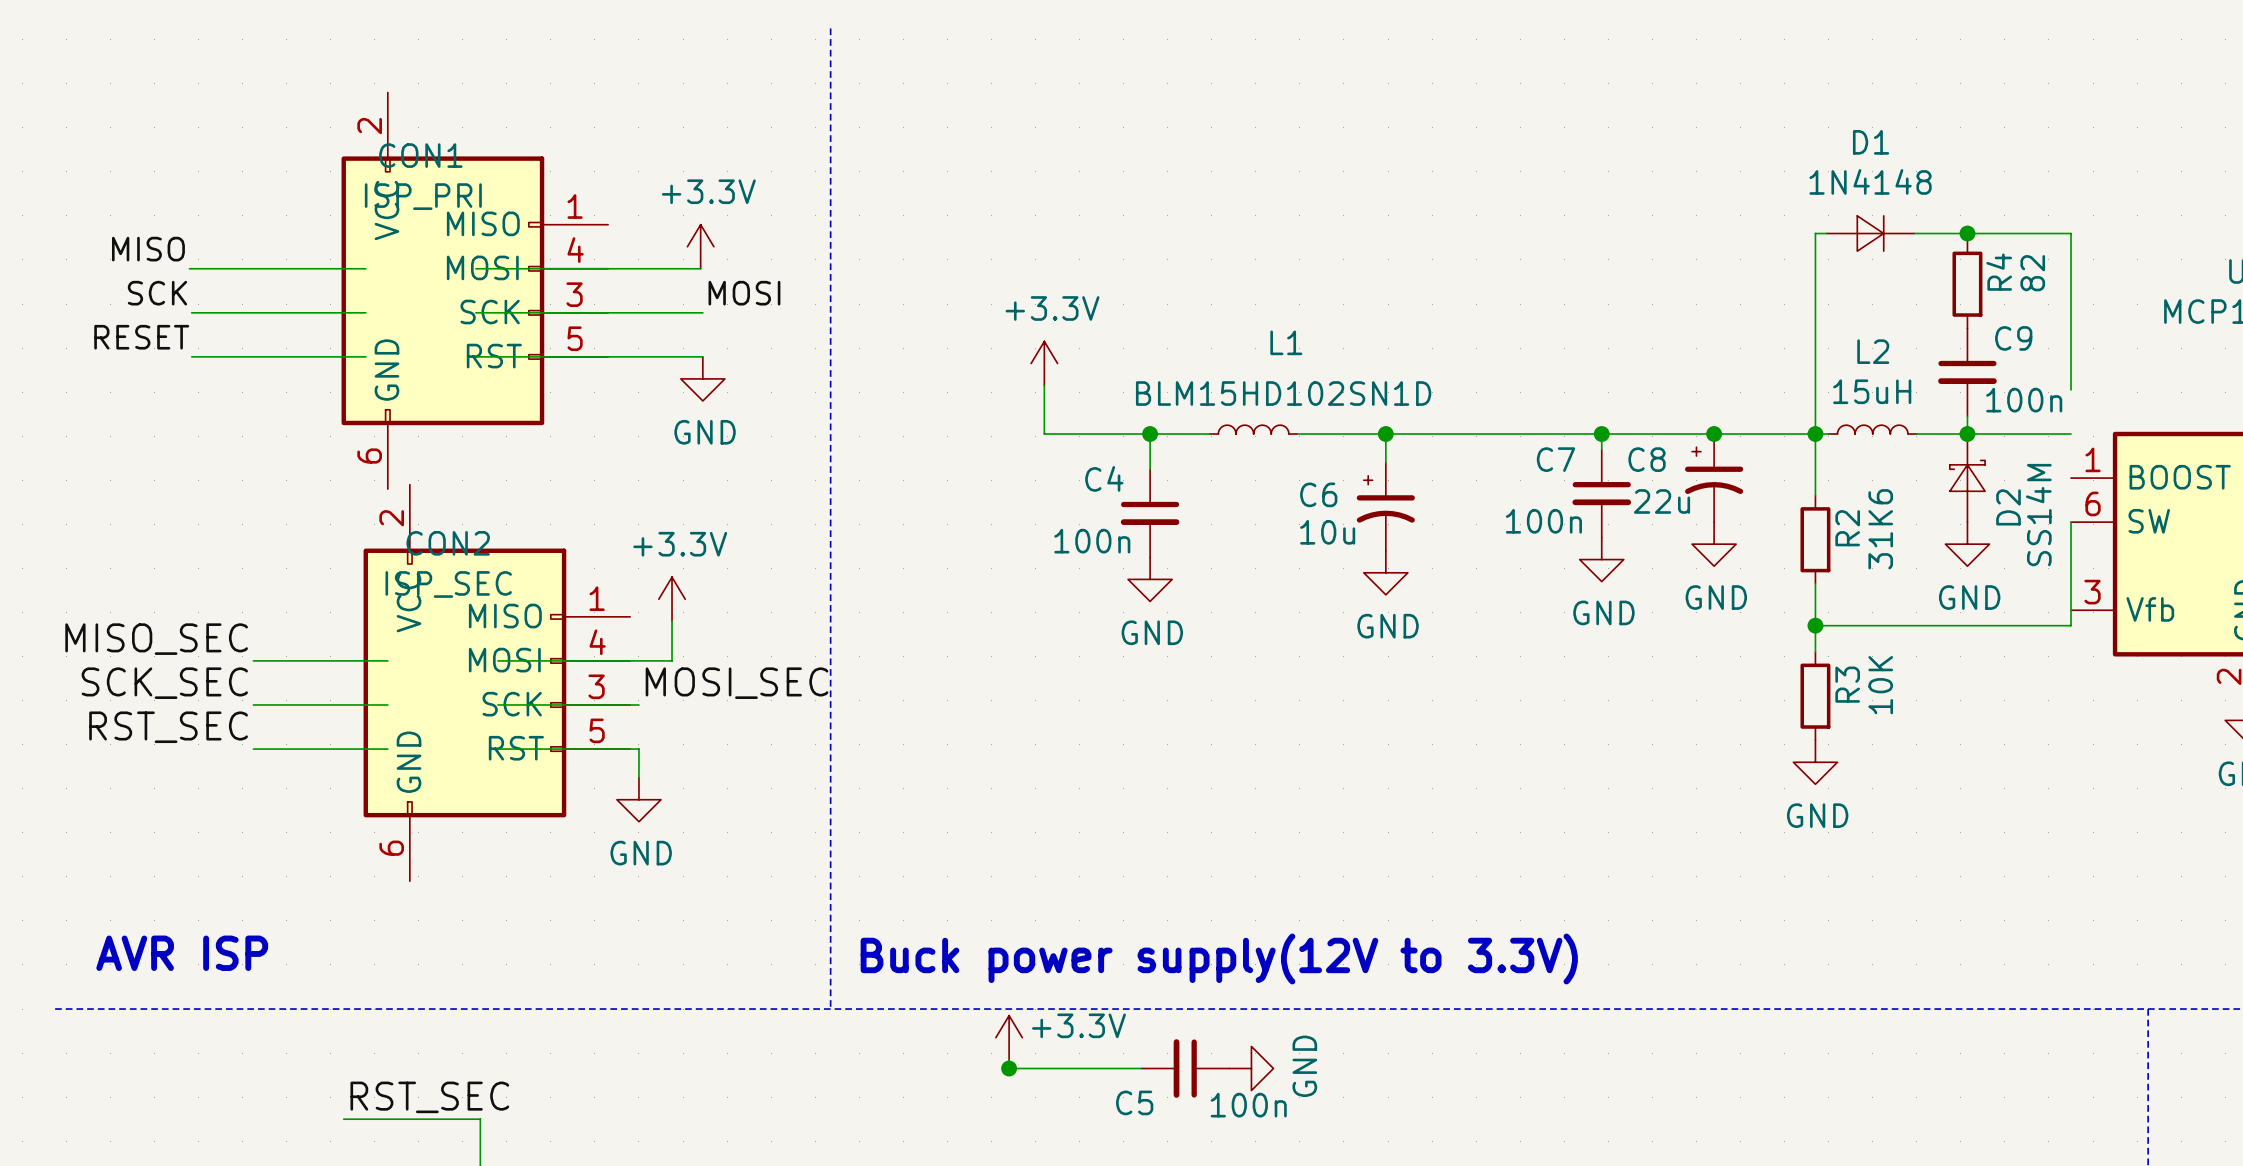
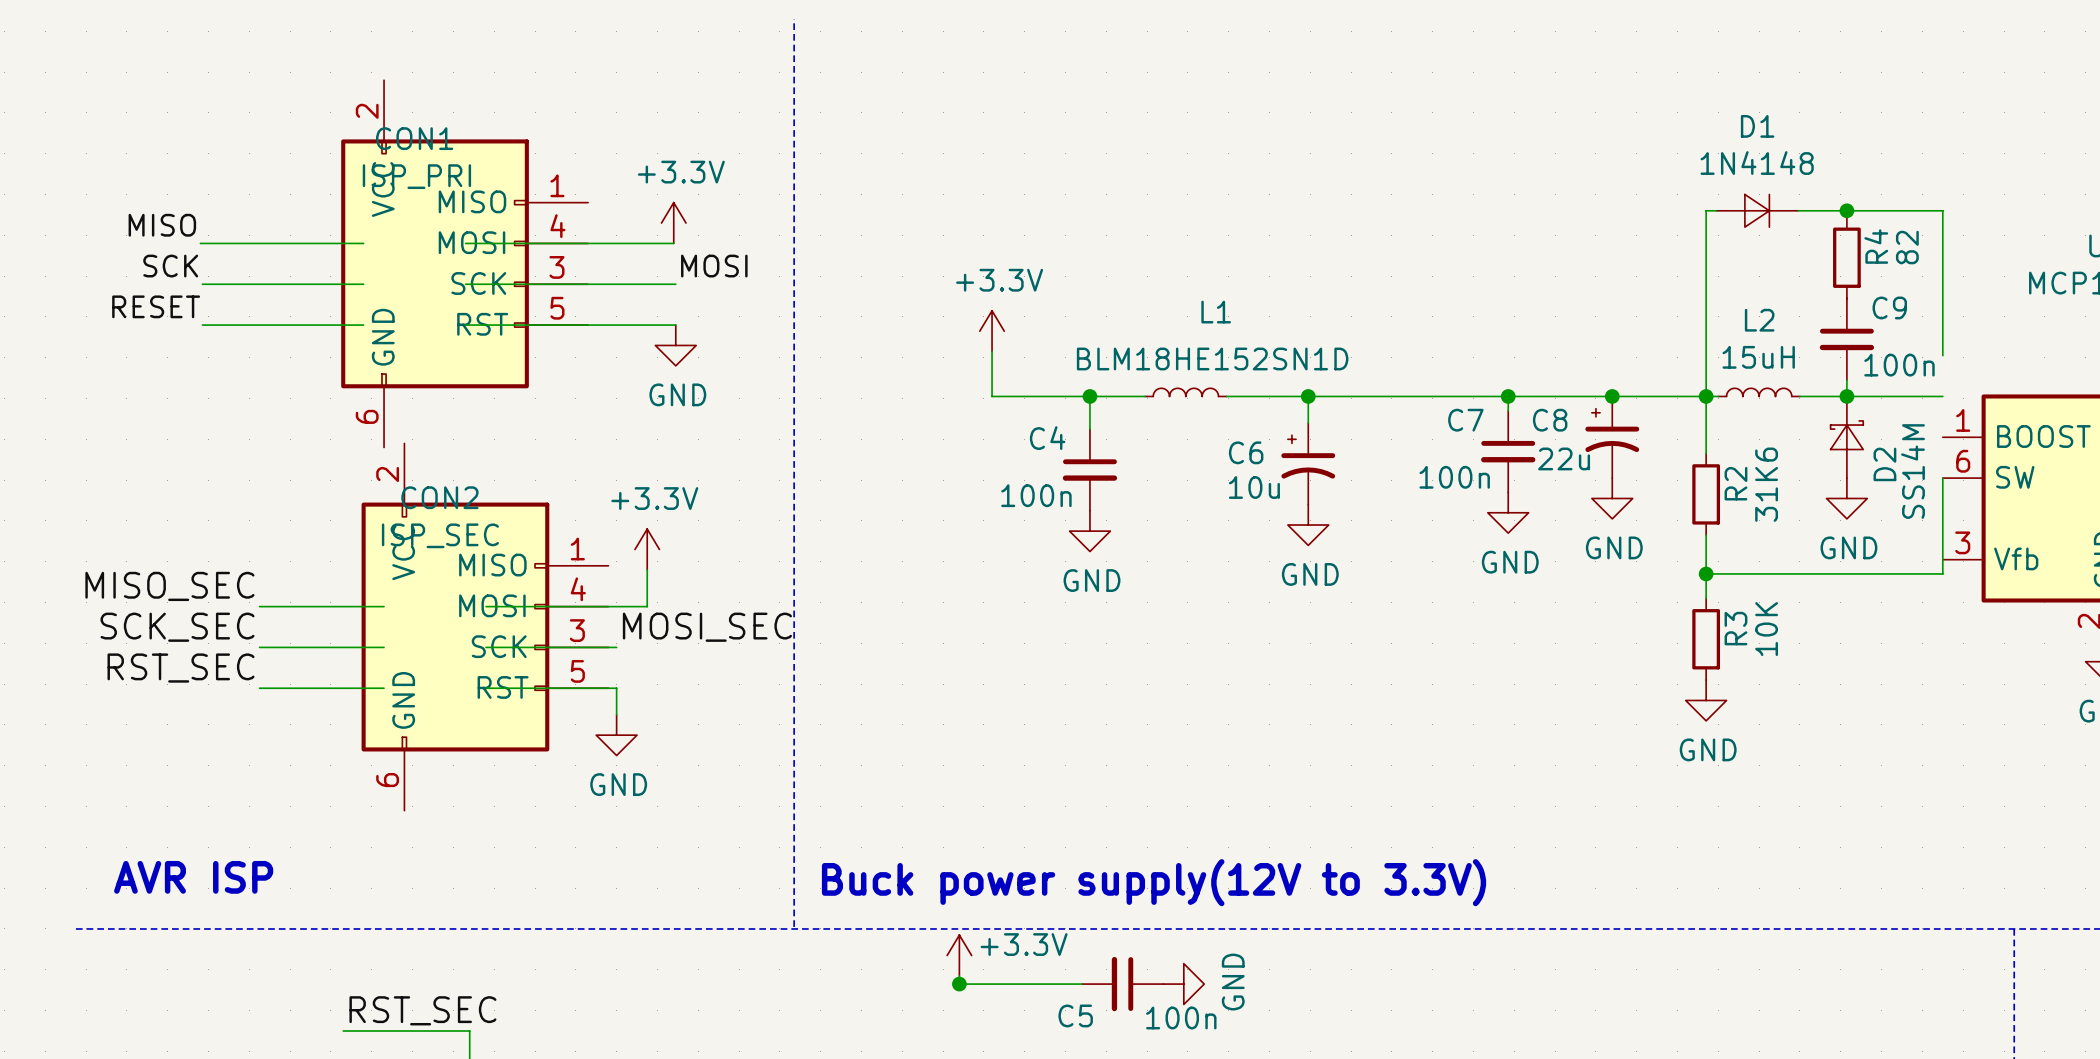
L1 value: BLM15HD102SN1D (1283, 393) -> BLM18HE152SN1D (1212, 358)

